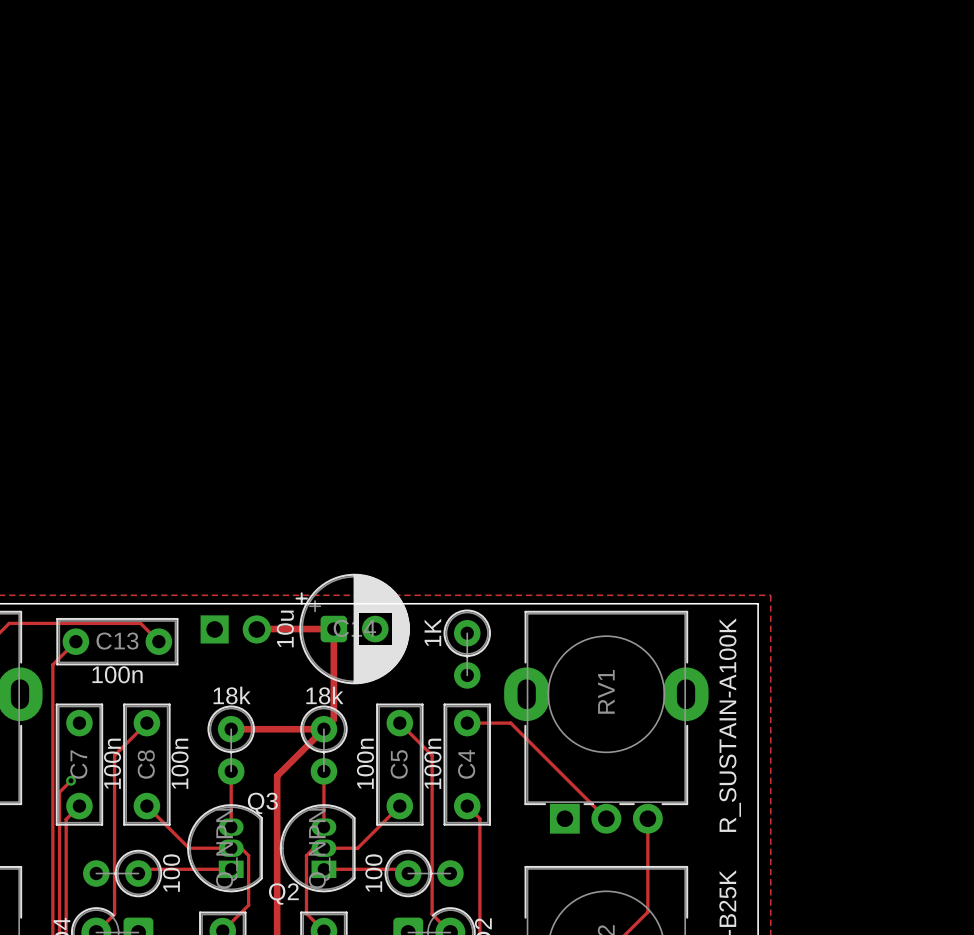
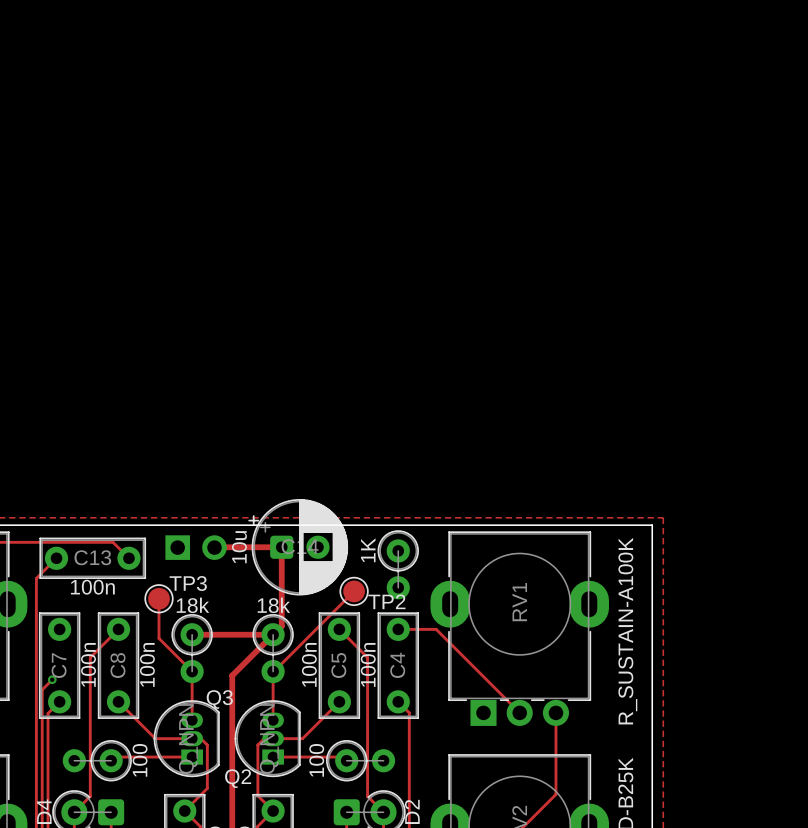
track: none -> (354, 591) (273, 671)
TP2: none -> (354, 591)
track: none -> (159, 598) (159, 638) (192, 671)
TP3: none -> (159, 598)

